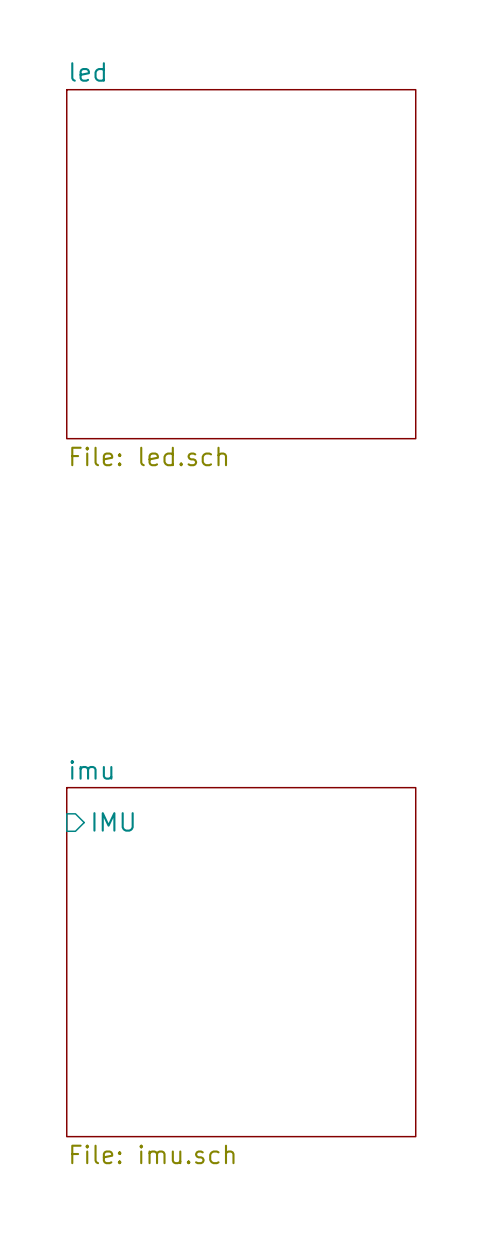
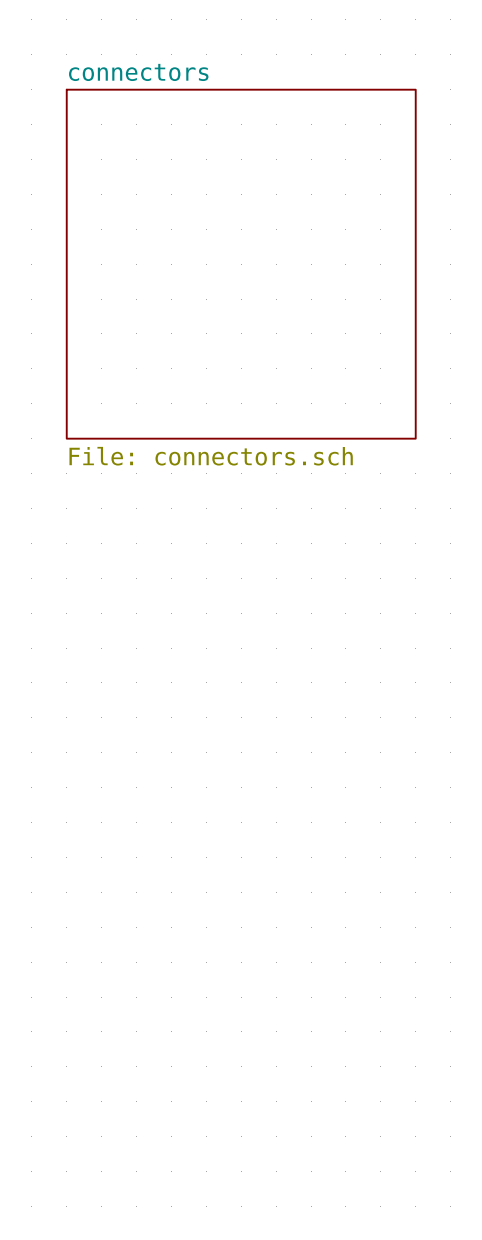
sheet led name: led (88, 71) -> connectors (138, 72)
sheet led value: File: led.sch (149, 456) -> File: connectors.sch (211, 456)
sheet pin: IMU (113, 821) -> none
sheet imu: File: imu.sch (241, 962) -> none

